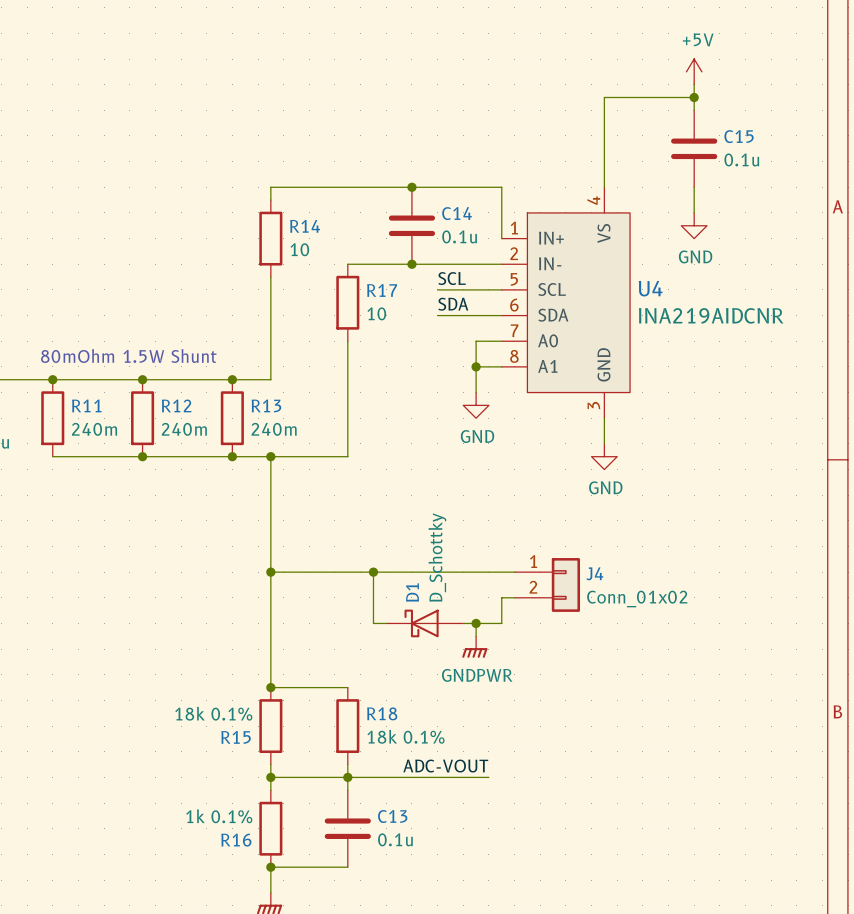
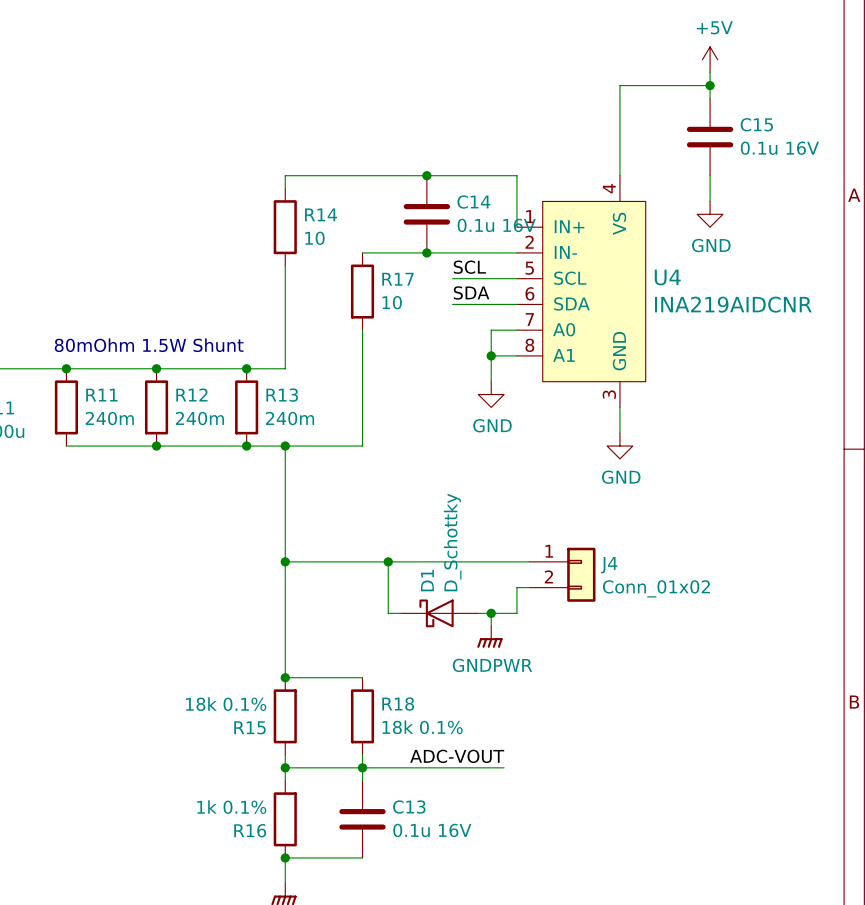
C15 value: 0.1u (741, 159) -> 0.1u 16V (779, 148)
C14 value: 0.1u (459, 236) -> 0.1u 16V (496, 225)
C13 value: 0.1u (395, 839) -> 0.1u 16V (432, 830)

